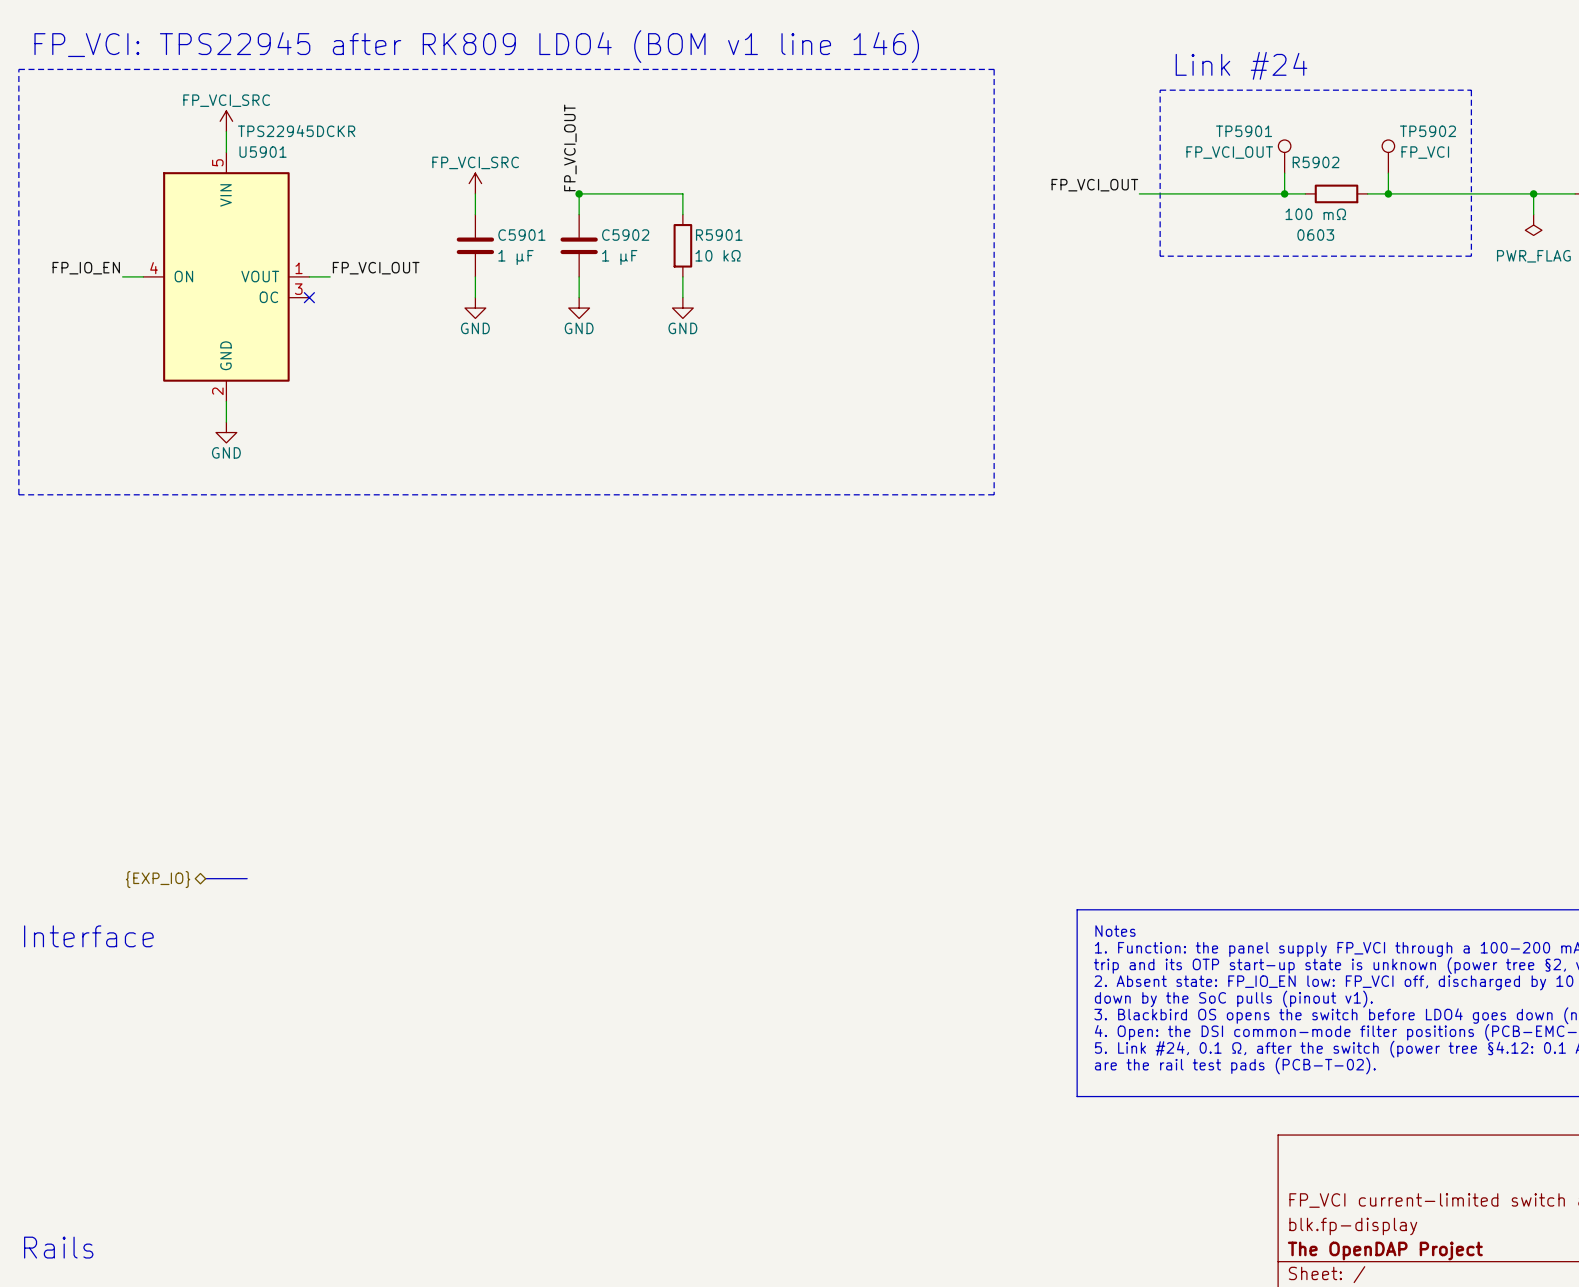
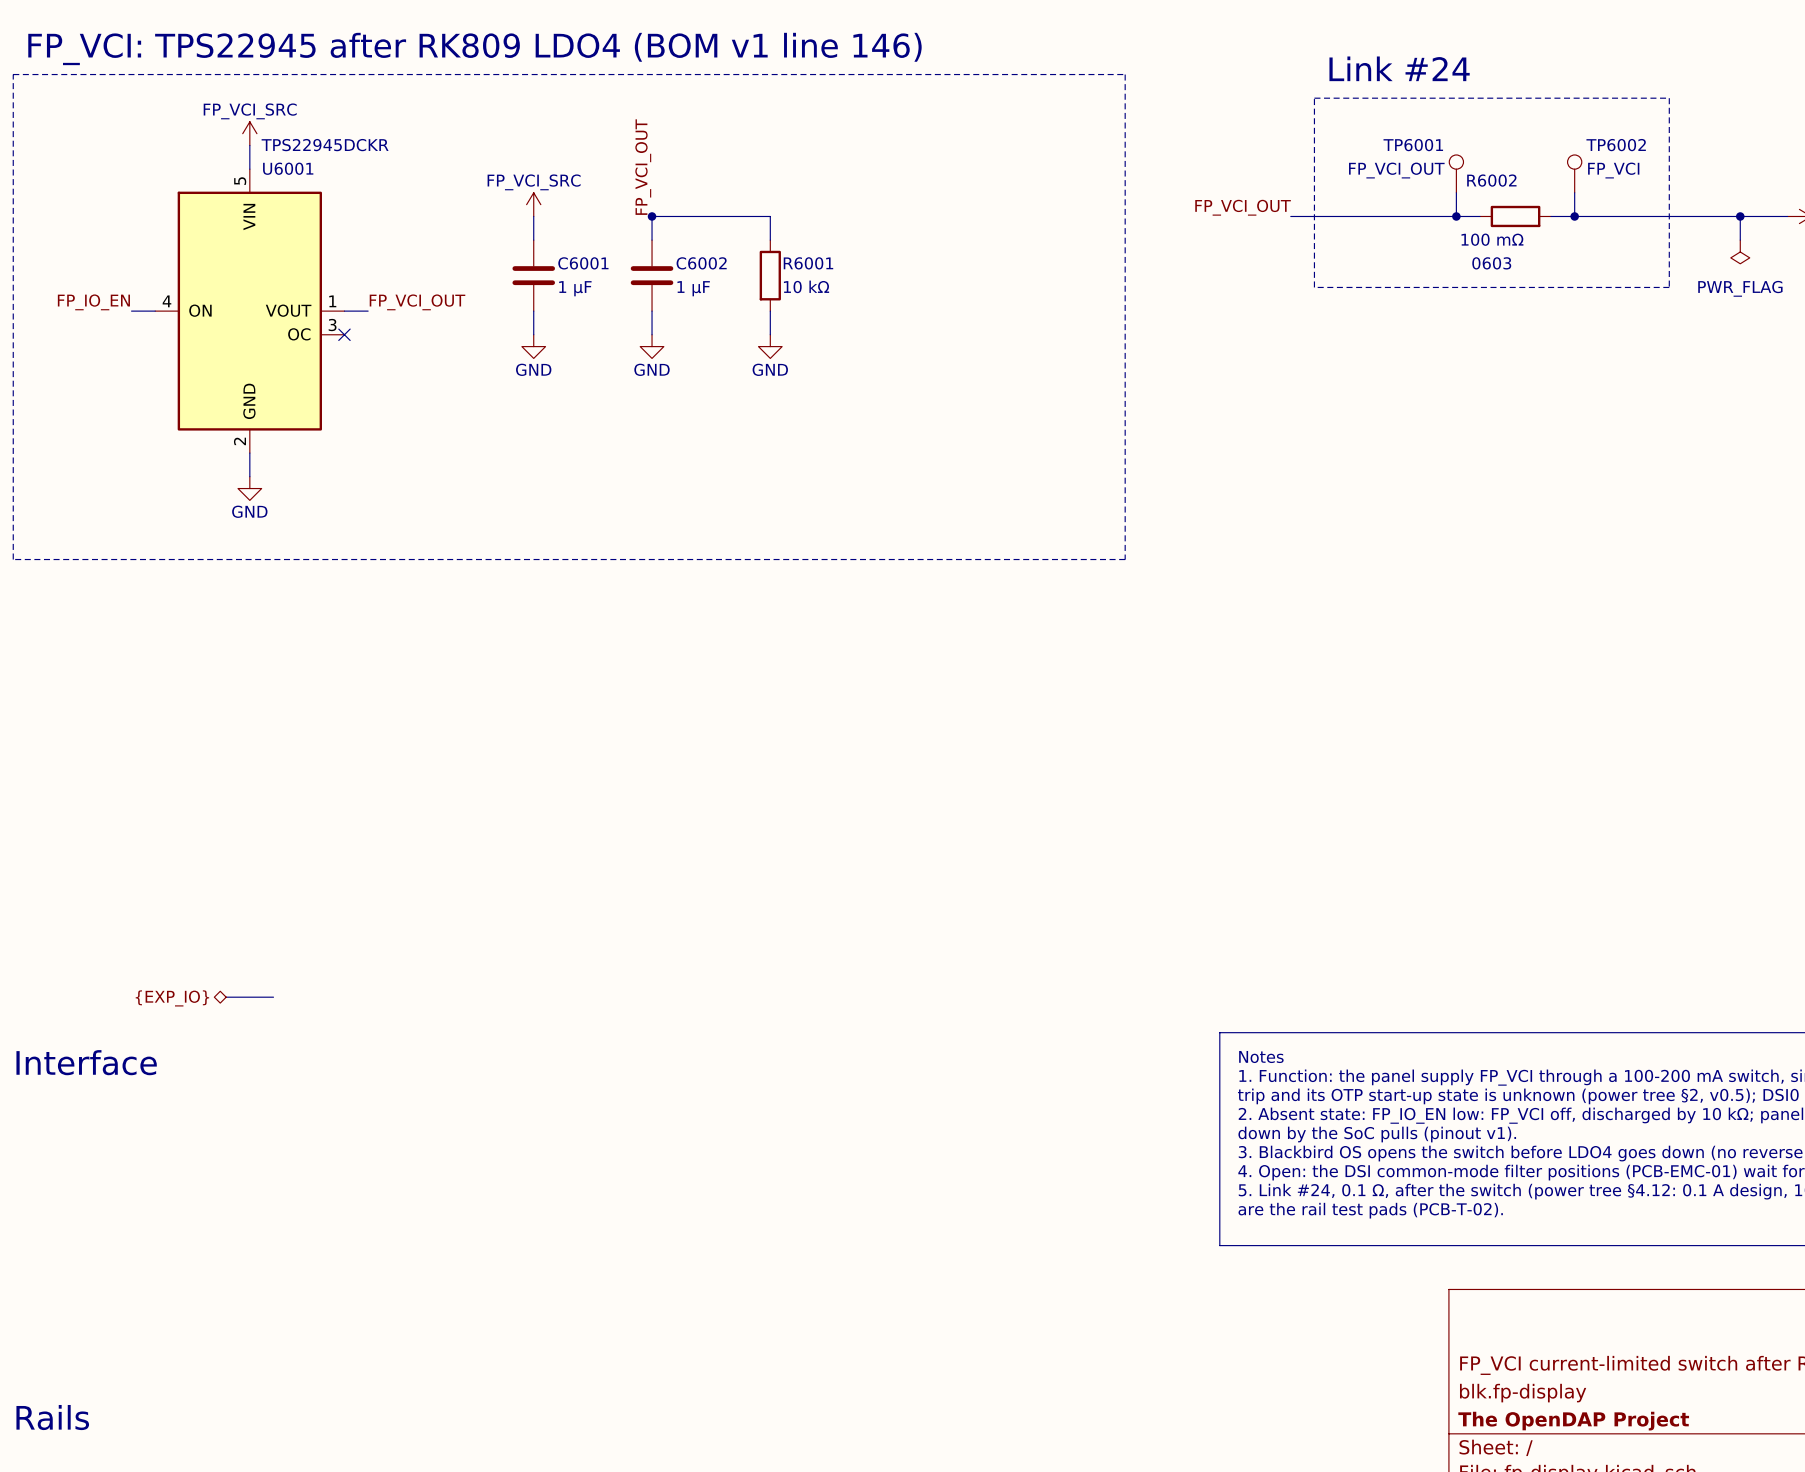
TP5901 name: TP5901 (1244, 131) -> TP6001 (1413, 145)
TP5902 name: TP5902 (1427, 131) -> TP6002 (1616, 145)
U5901 name: U5901 (263, 152) -> U6001 (288, 168)
R5902 name: R5902 (1316, 162) -> R6002 (1491, 180)
C5901 name: C5901 (521, 235) -> C6001 (583, 263)
C5902 name: C5902 (625, 235) -> C6002 (701, 263)
R5901 name: R5901 (719, 235) -> R6001 (808, 263)

